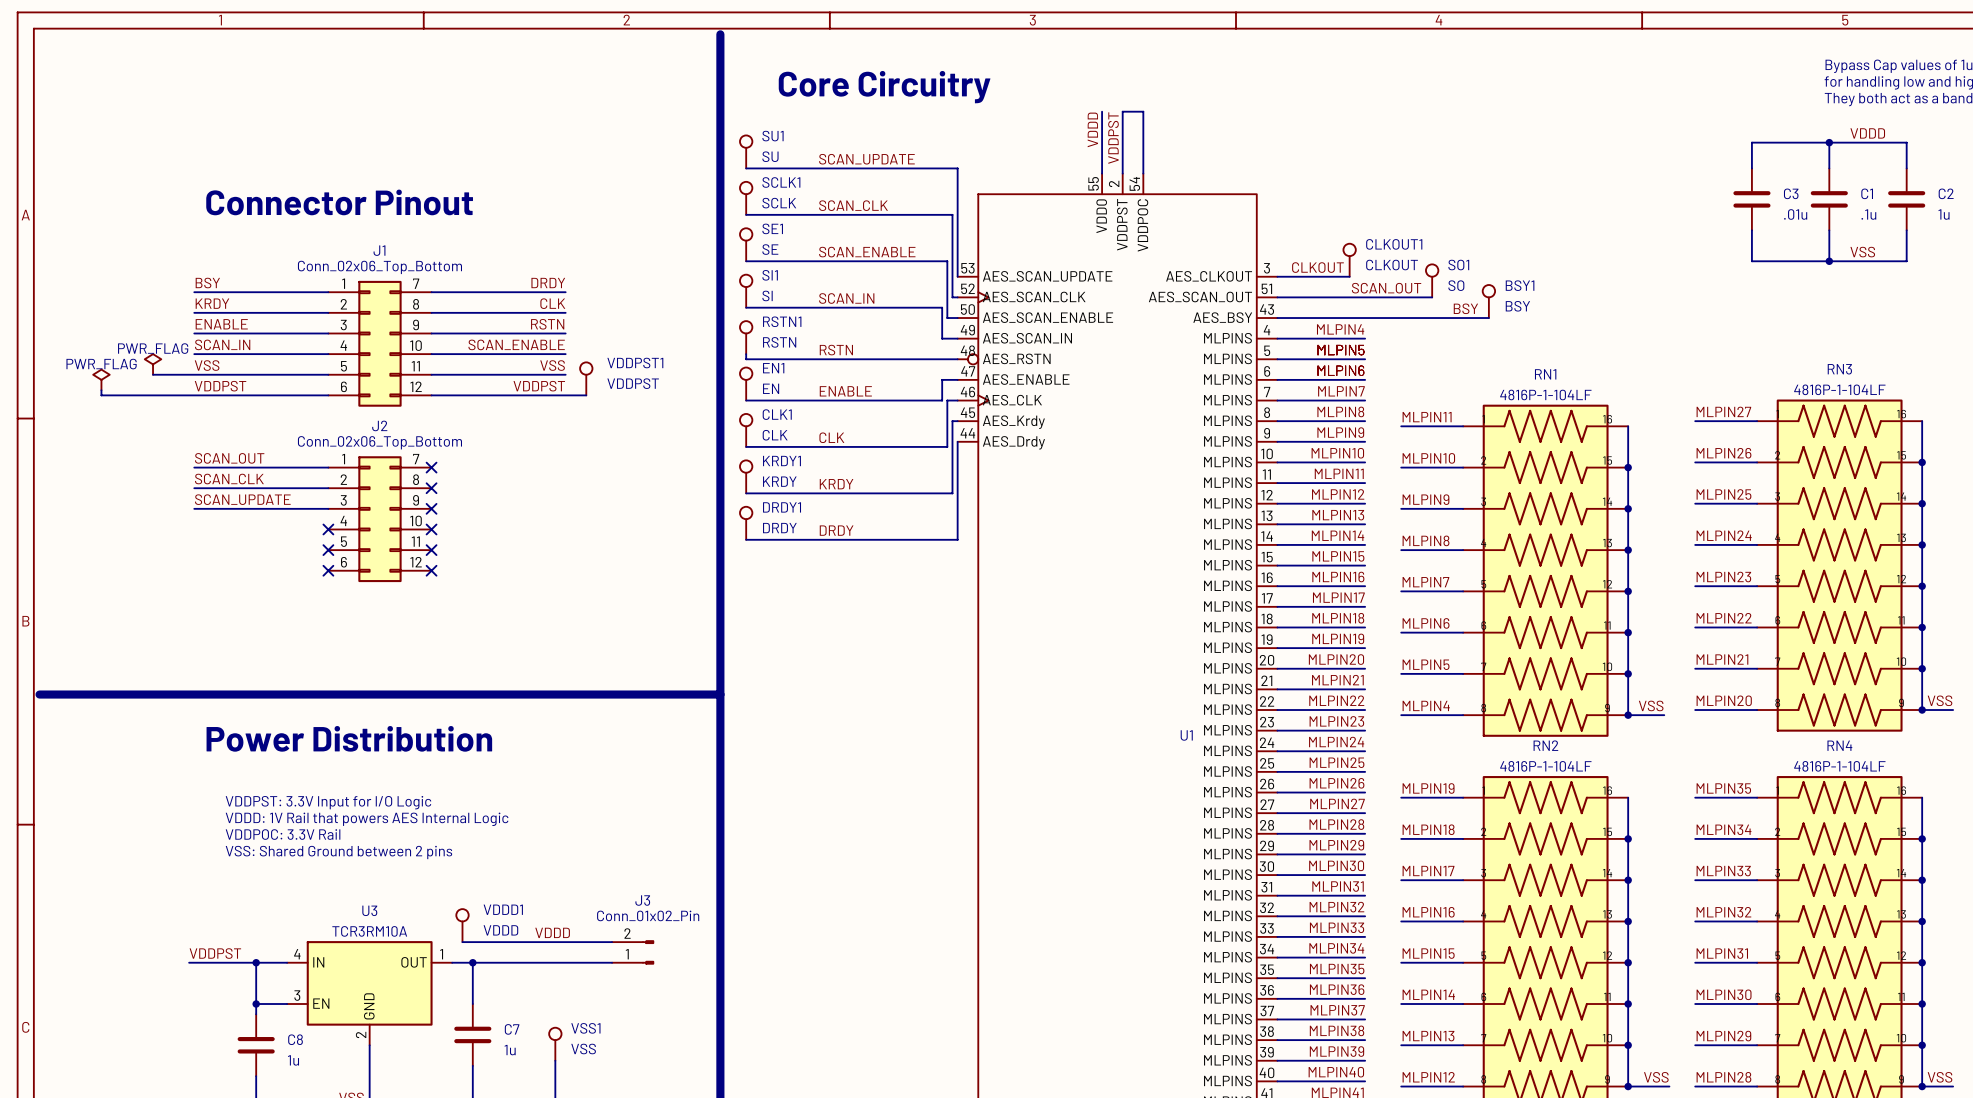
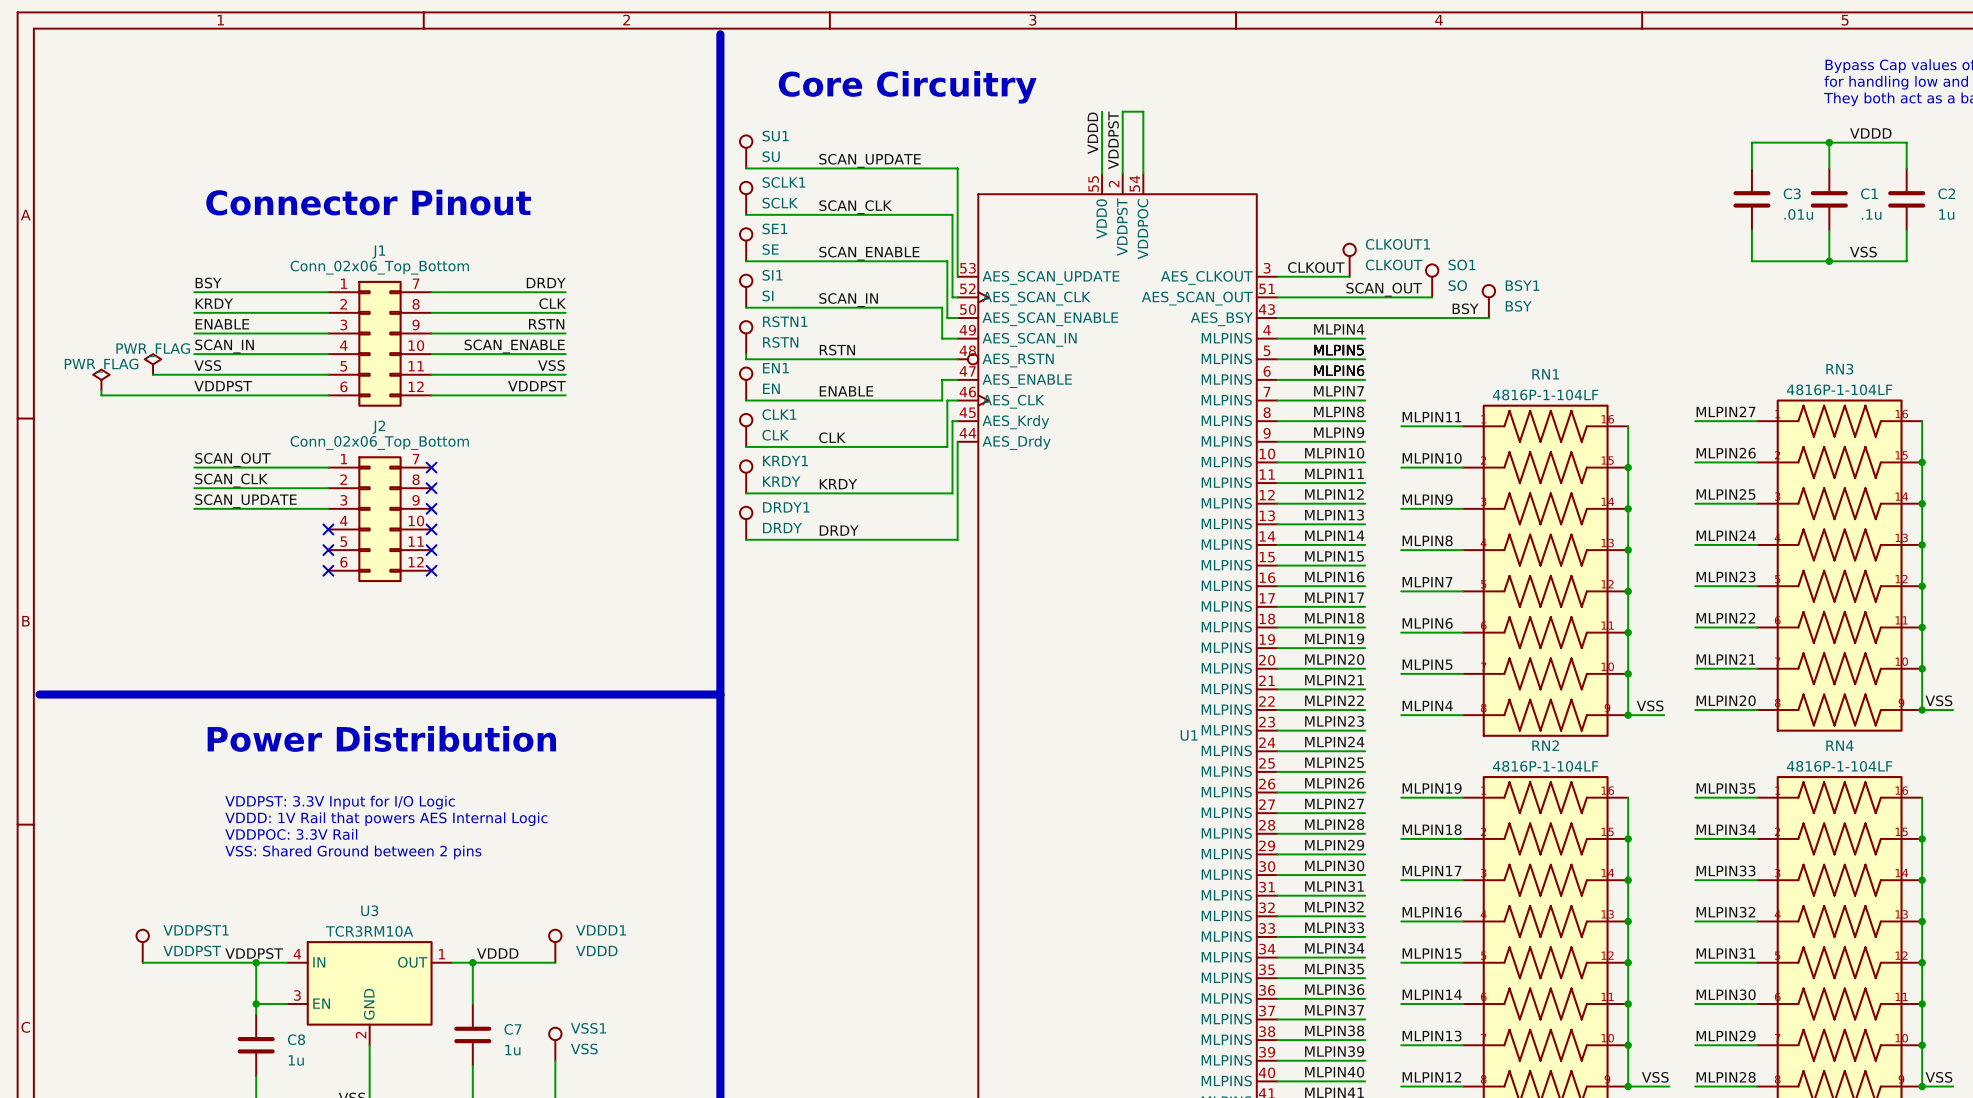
VDDPST1 position: (586, 378) -> (142, 946)
wire: (565, 395) (586, 395) -> none
VDDD1 position: (462, 925) -> (555, 946)
label position: VDDD (552, 932) -> VDDD (497, 953)
wire: (462, 942) (612, 942) -> none
J3: Conn_01x02_Pin (633, 952) -> none
label position: VDDPST (215, 953) -> VDDPST (254, 953)
wire: none -> (142, 962) (189, 962)
wire: (555, 962) (612, 962) -> none

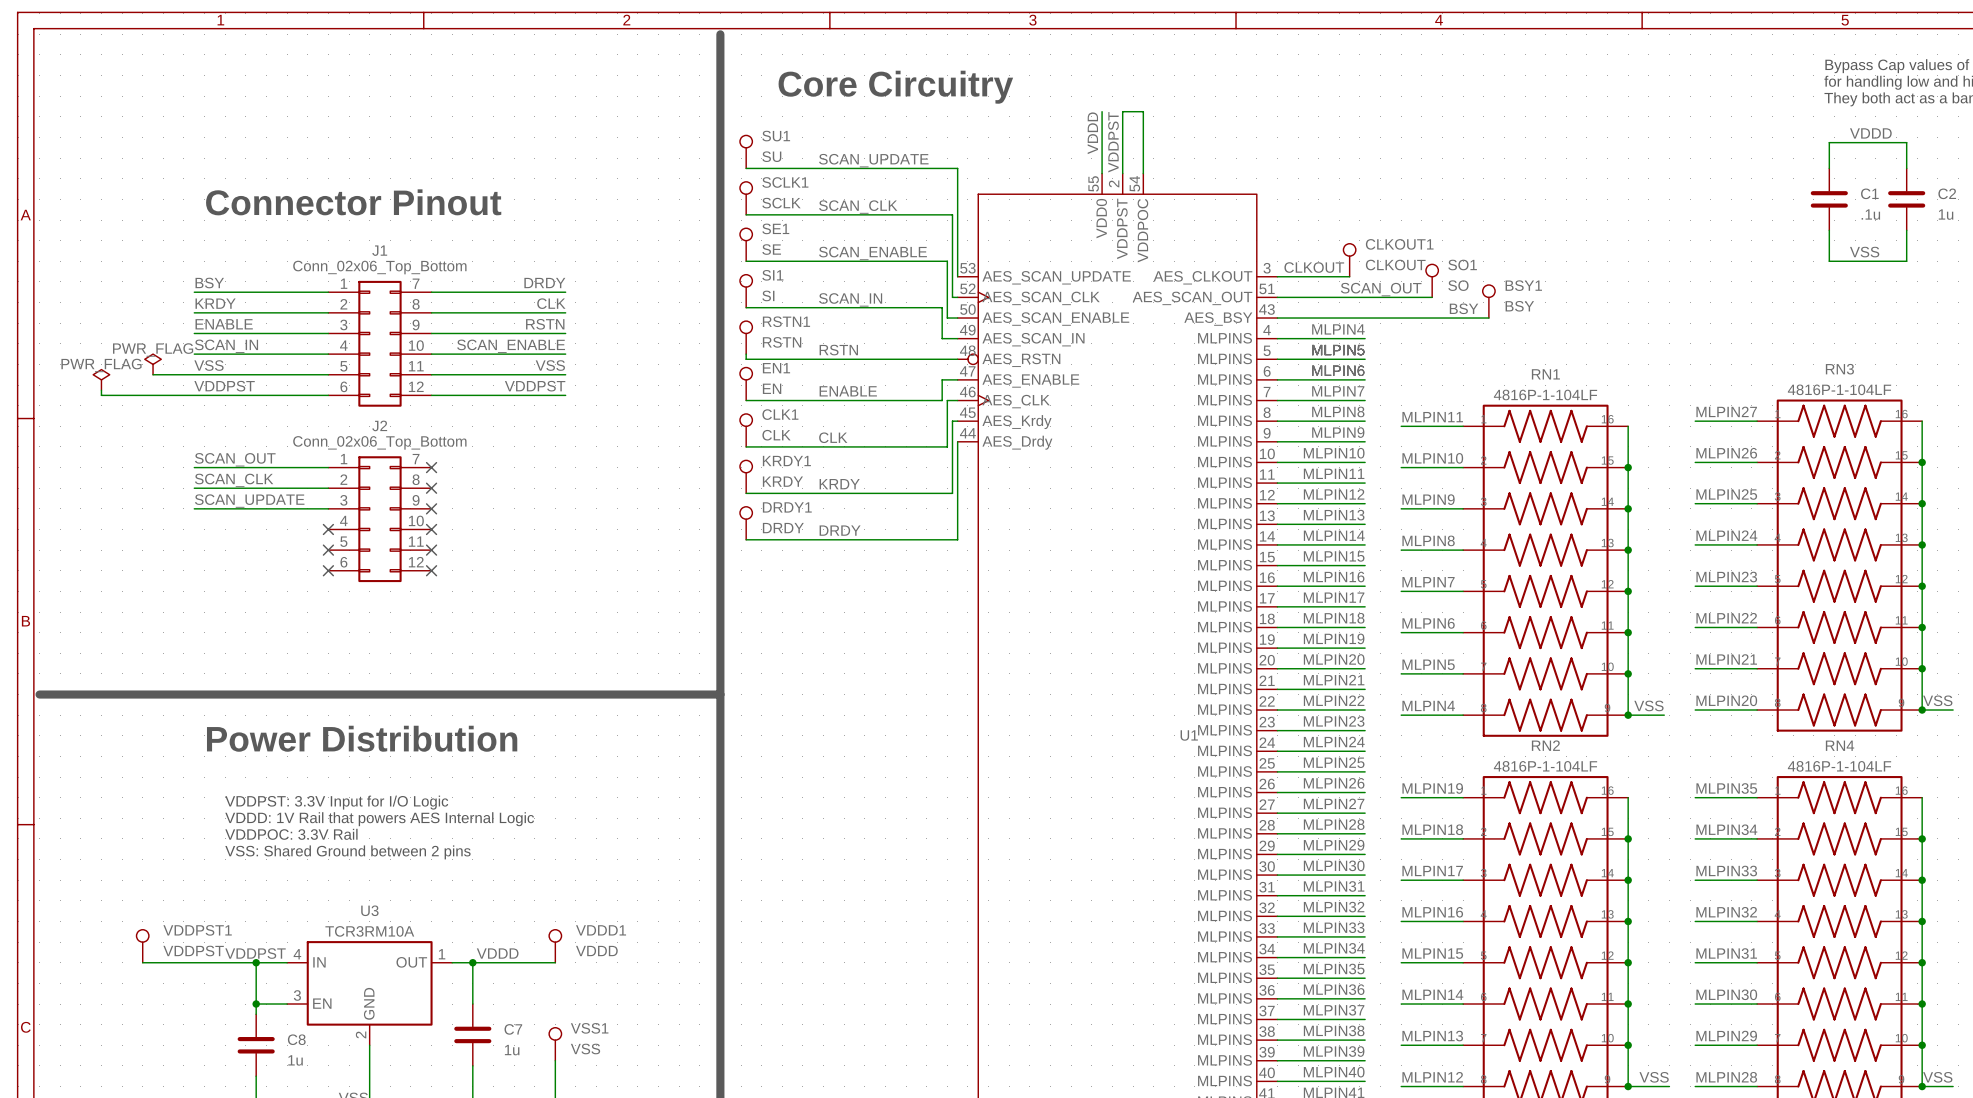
wire: (1829, 142) (1751, 142) (1751, 168) -> none
junction: (1829, 142) -> none
C3: .01u (1751, 199) -> none
wire: (1751, 230) (1751, 261) (1829, 261) -> none
junction: (1829, 261) -> none

